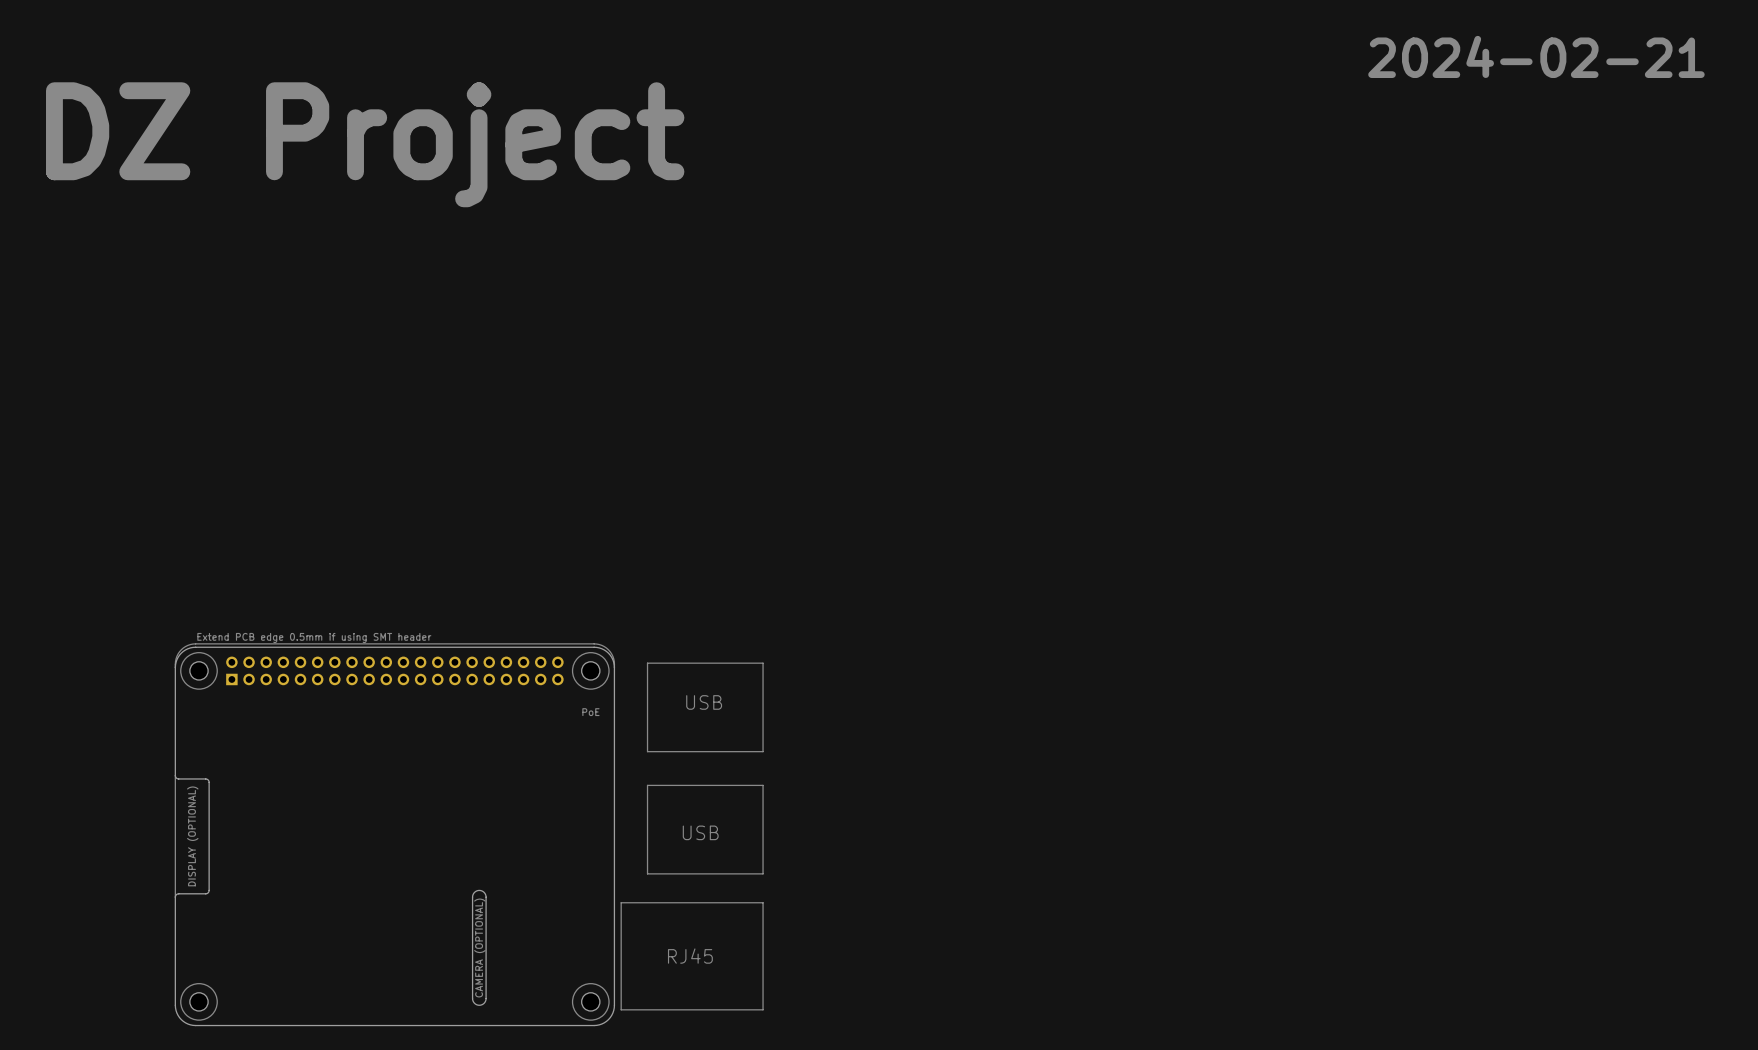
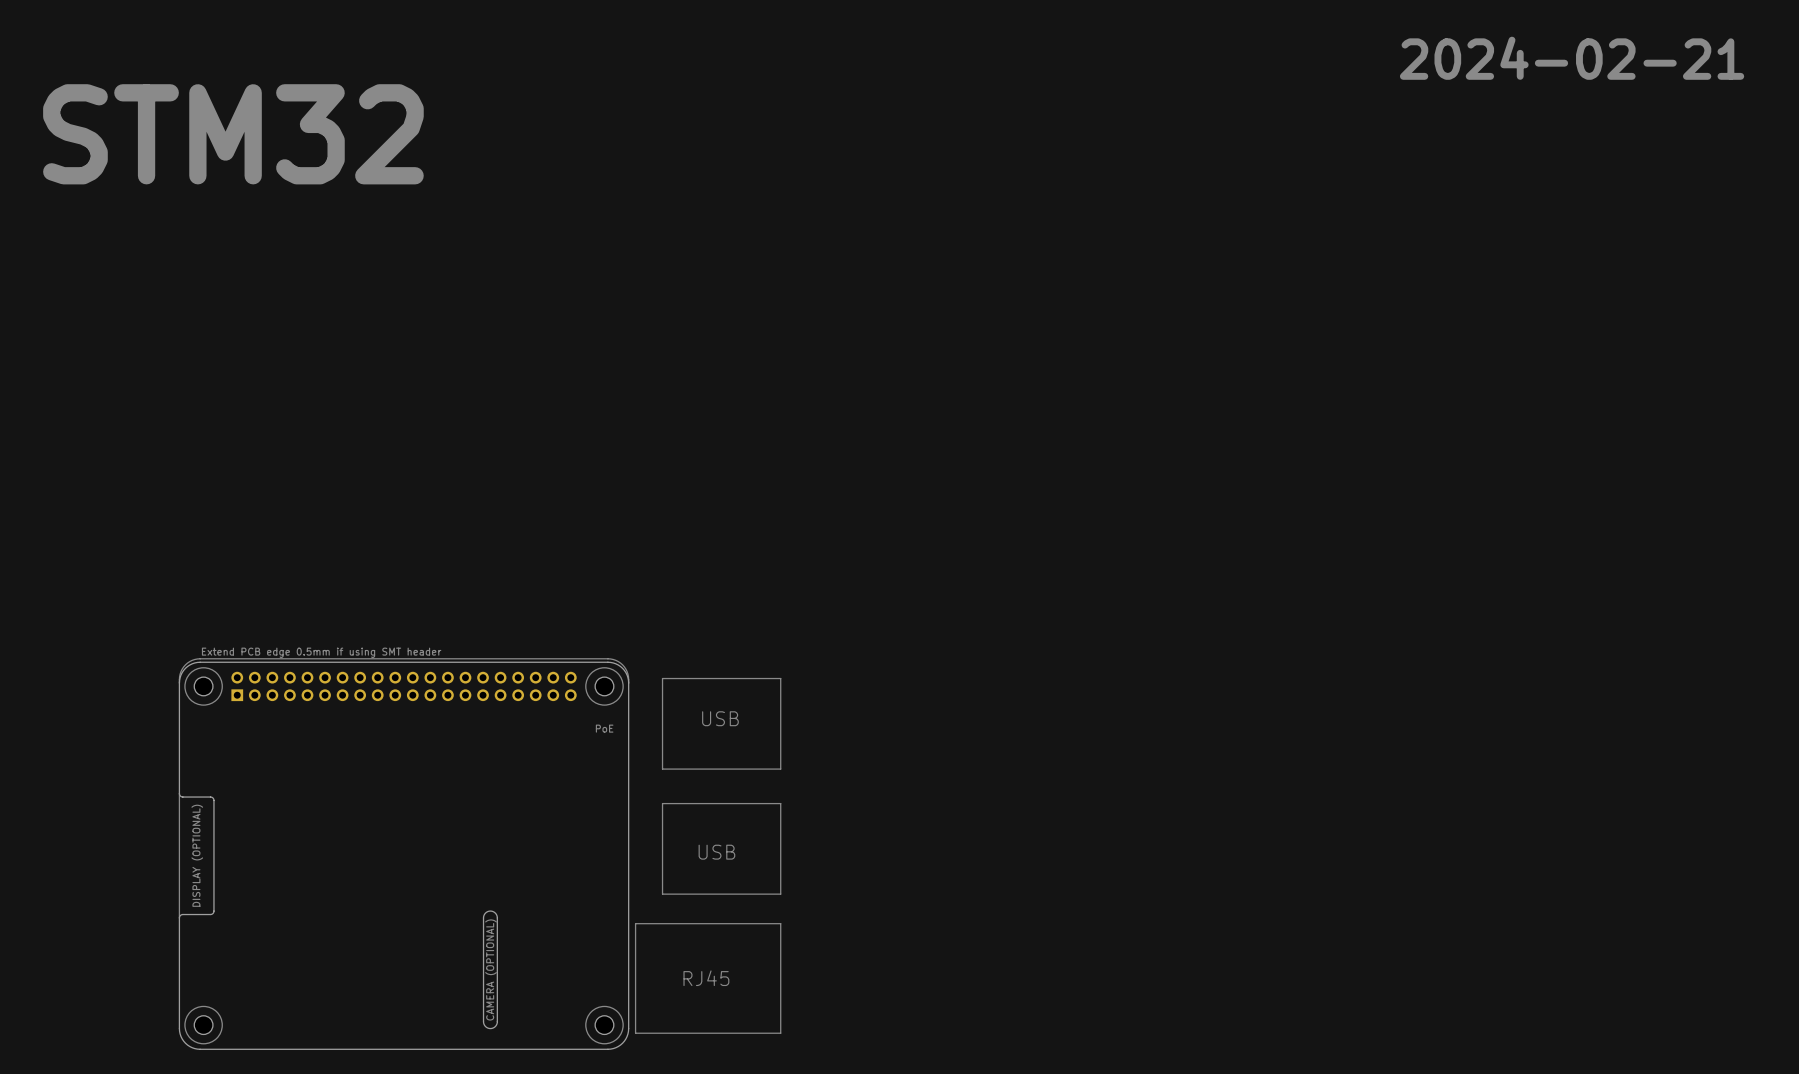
text: DZ Project (365, 144) -> STM32 (233, 134)

